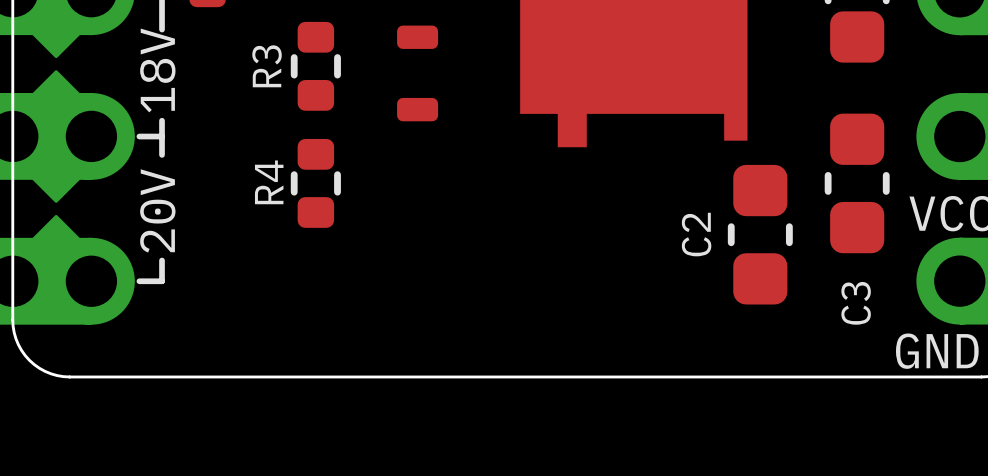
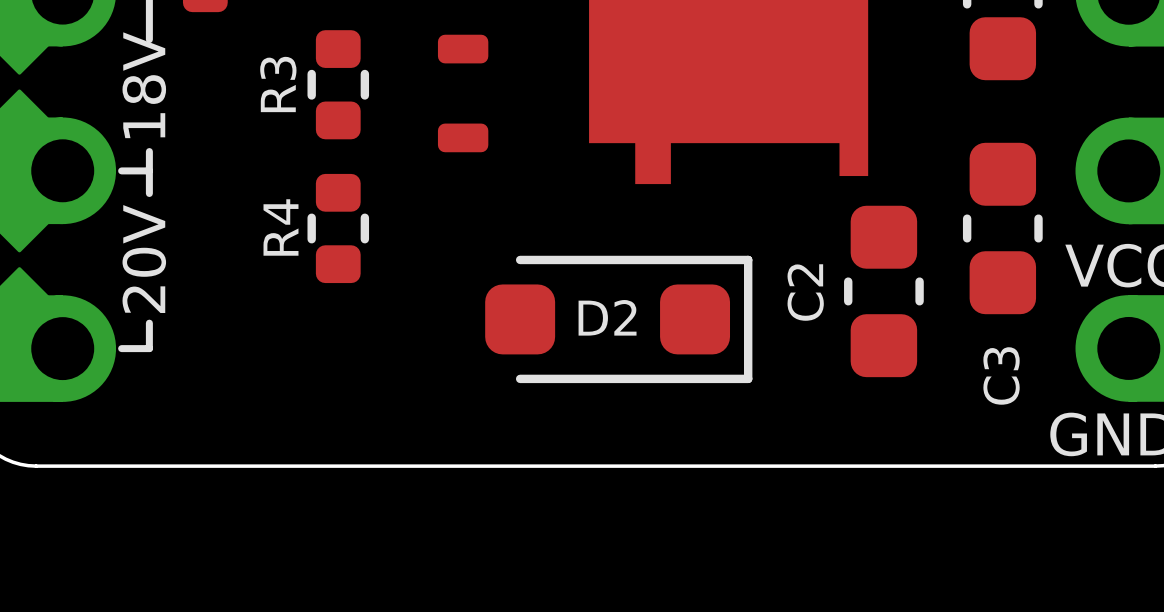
D2: none -> (618, 319)

